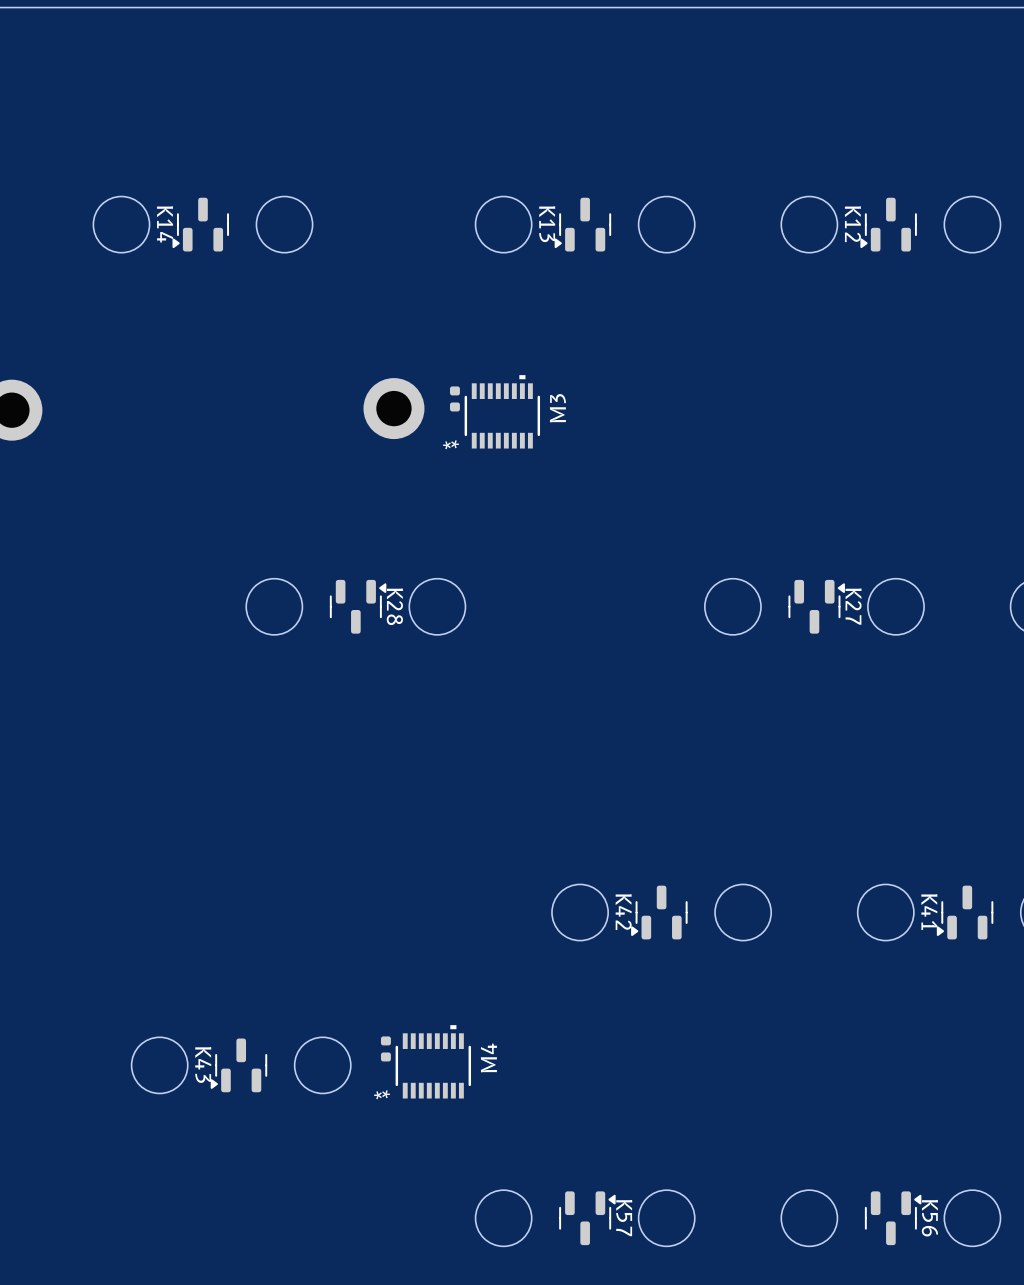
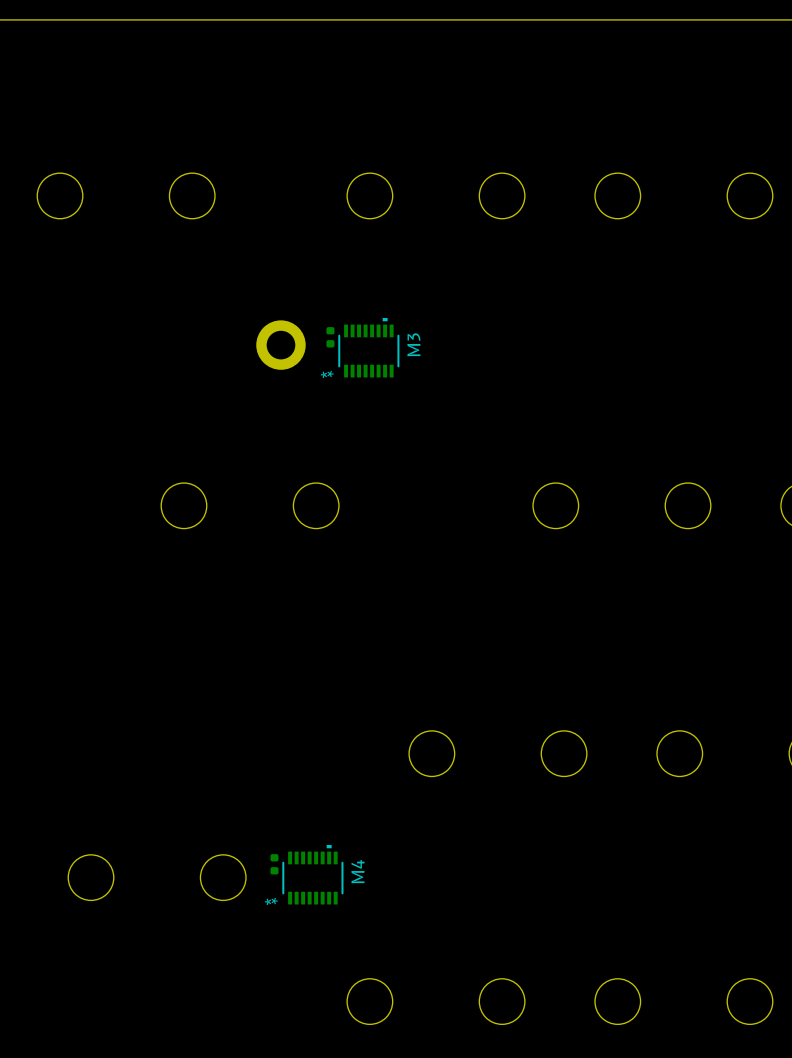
K14: (200, 224) -> none
K13: (582, 224) -> none
K12: (888, 224) -> none
K28: (358, 606) -> none
K27: (816, 606) -> none
K42: (659, 912) -> none
K41: (965, 912) -> none
K43: (238, 1065) -> none
K57: (587, 1218) -> none
K56: (893, 1218) -> none

